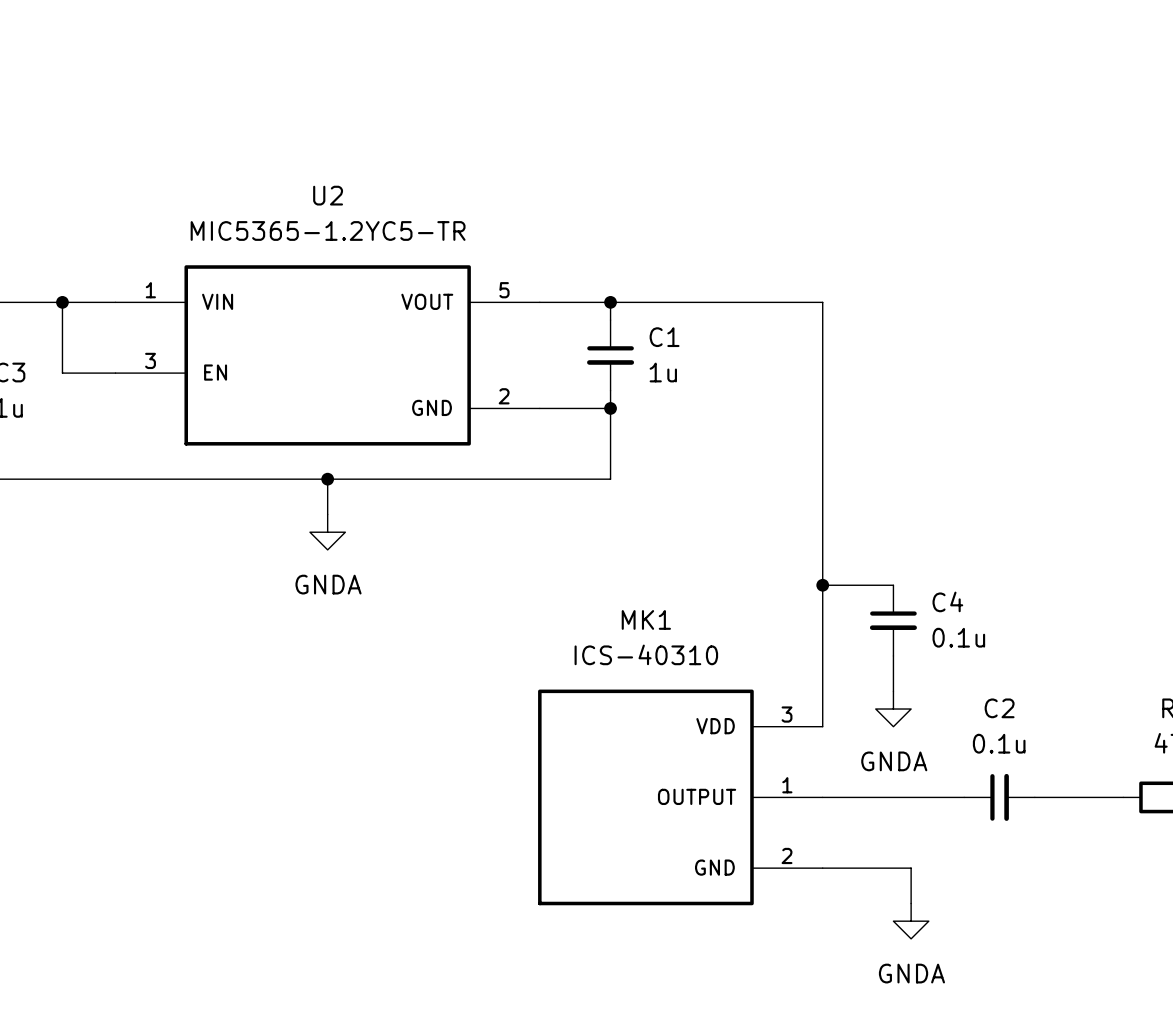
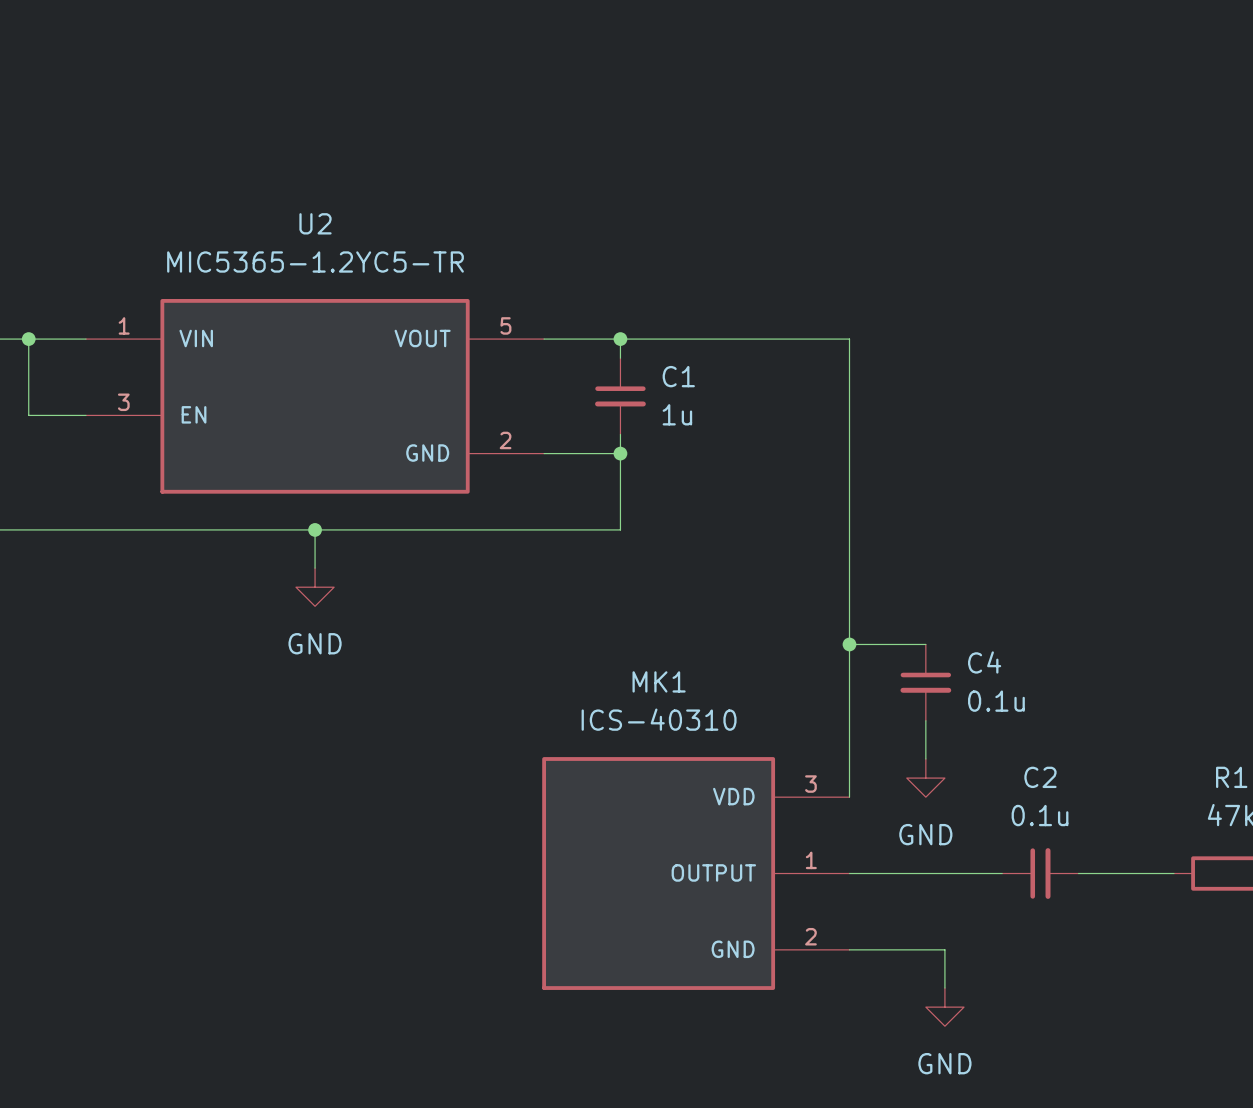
power symbol: GNDA (327, 532) -> GND (315, 587)
power symbol: GNDA (893, 709) -> GND (925, 778)
power symbol: GNDA (911, 921) -> GND (944, 1007)

